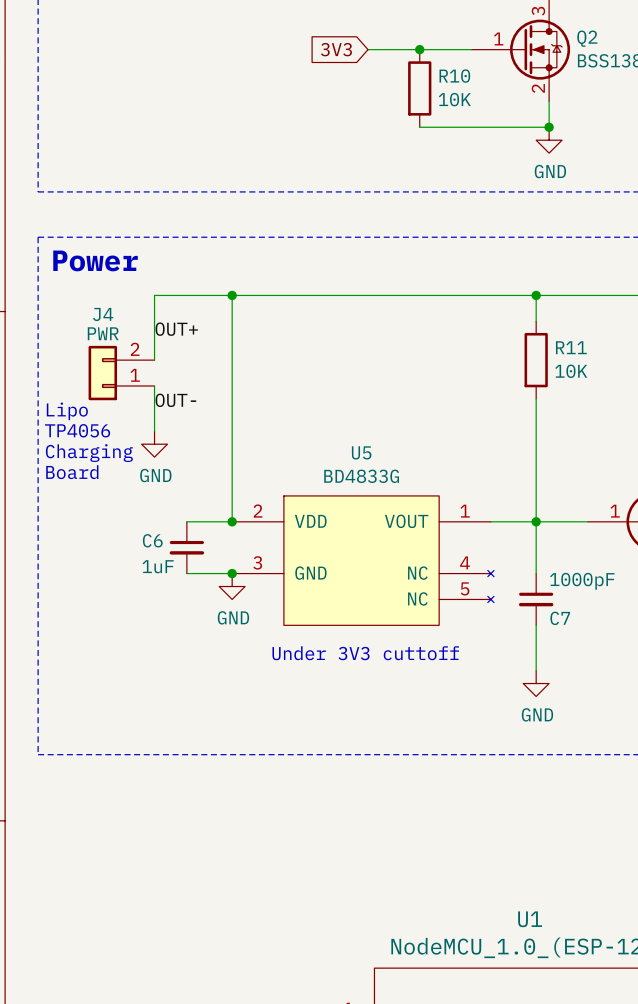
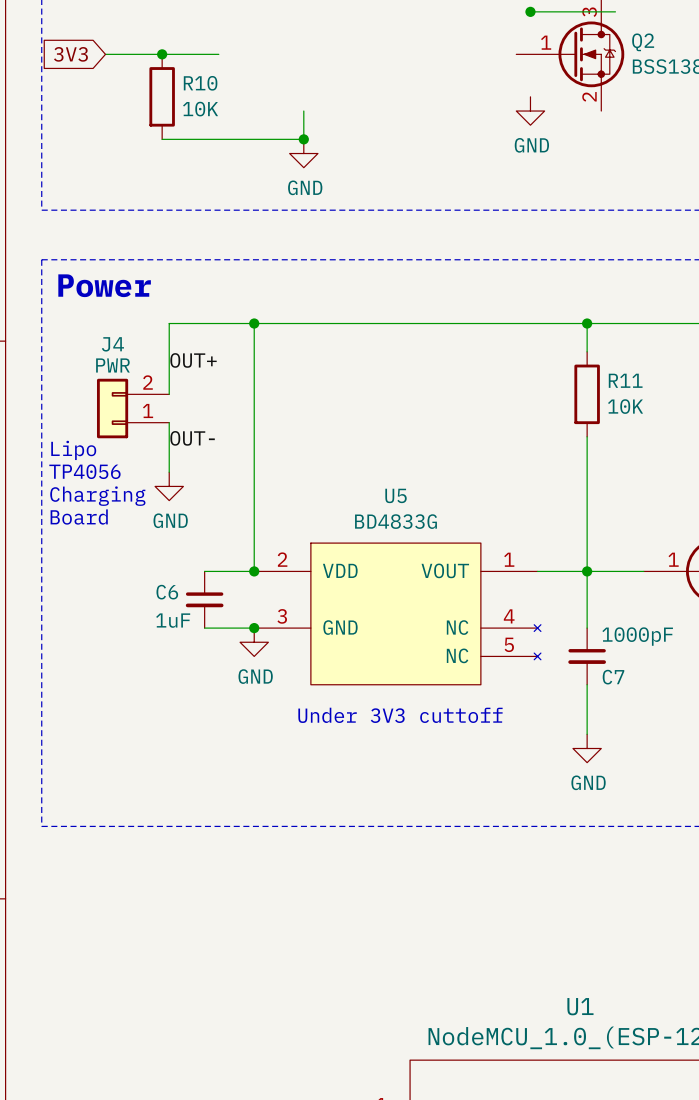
wire: none -> (530, 11) (615, 11)
junction: none -> (530, 11)
global label: none -> 3V3 (70, 54)
wire: none -> (105, 54) (218, 54)
junction: none -> (162, 54)
global label: 3V3 (336, 49) -> none
wire: (368, 49) (471, 49) -> none
junction: (419, 49) -> none
R10 position: (419, 88) -> (162, 96)
wire: none -> (303, 111) (303, 139) (162, 139)
wire: (549, 101) (549, 127) (419, 127) -> none
junction: none -> (303, 139)
junction: (549, 127) -> none
power symbol: none -> GND (303, 153)
power symbol position: GND (549, 140) -> GND (530, 111)

